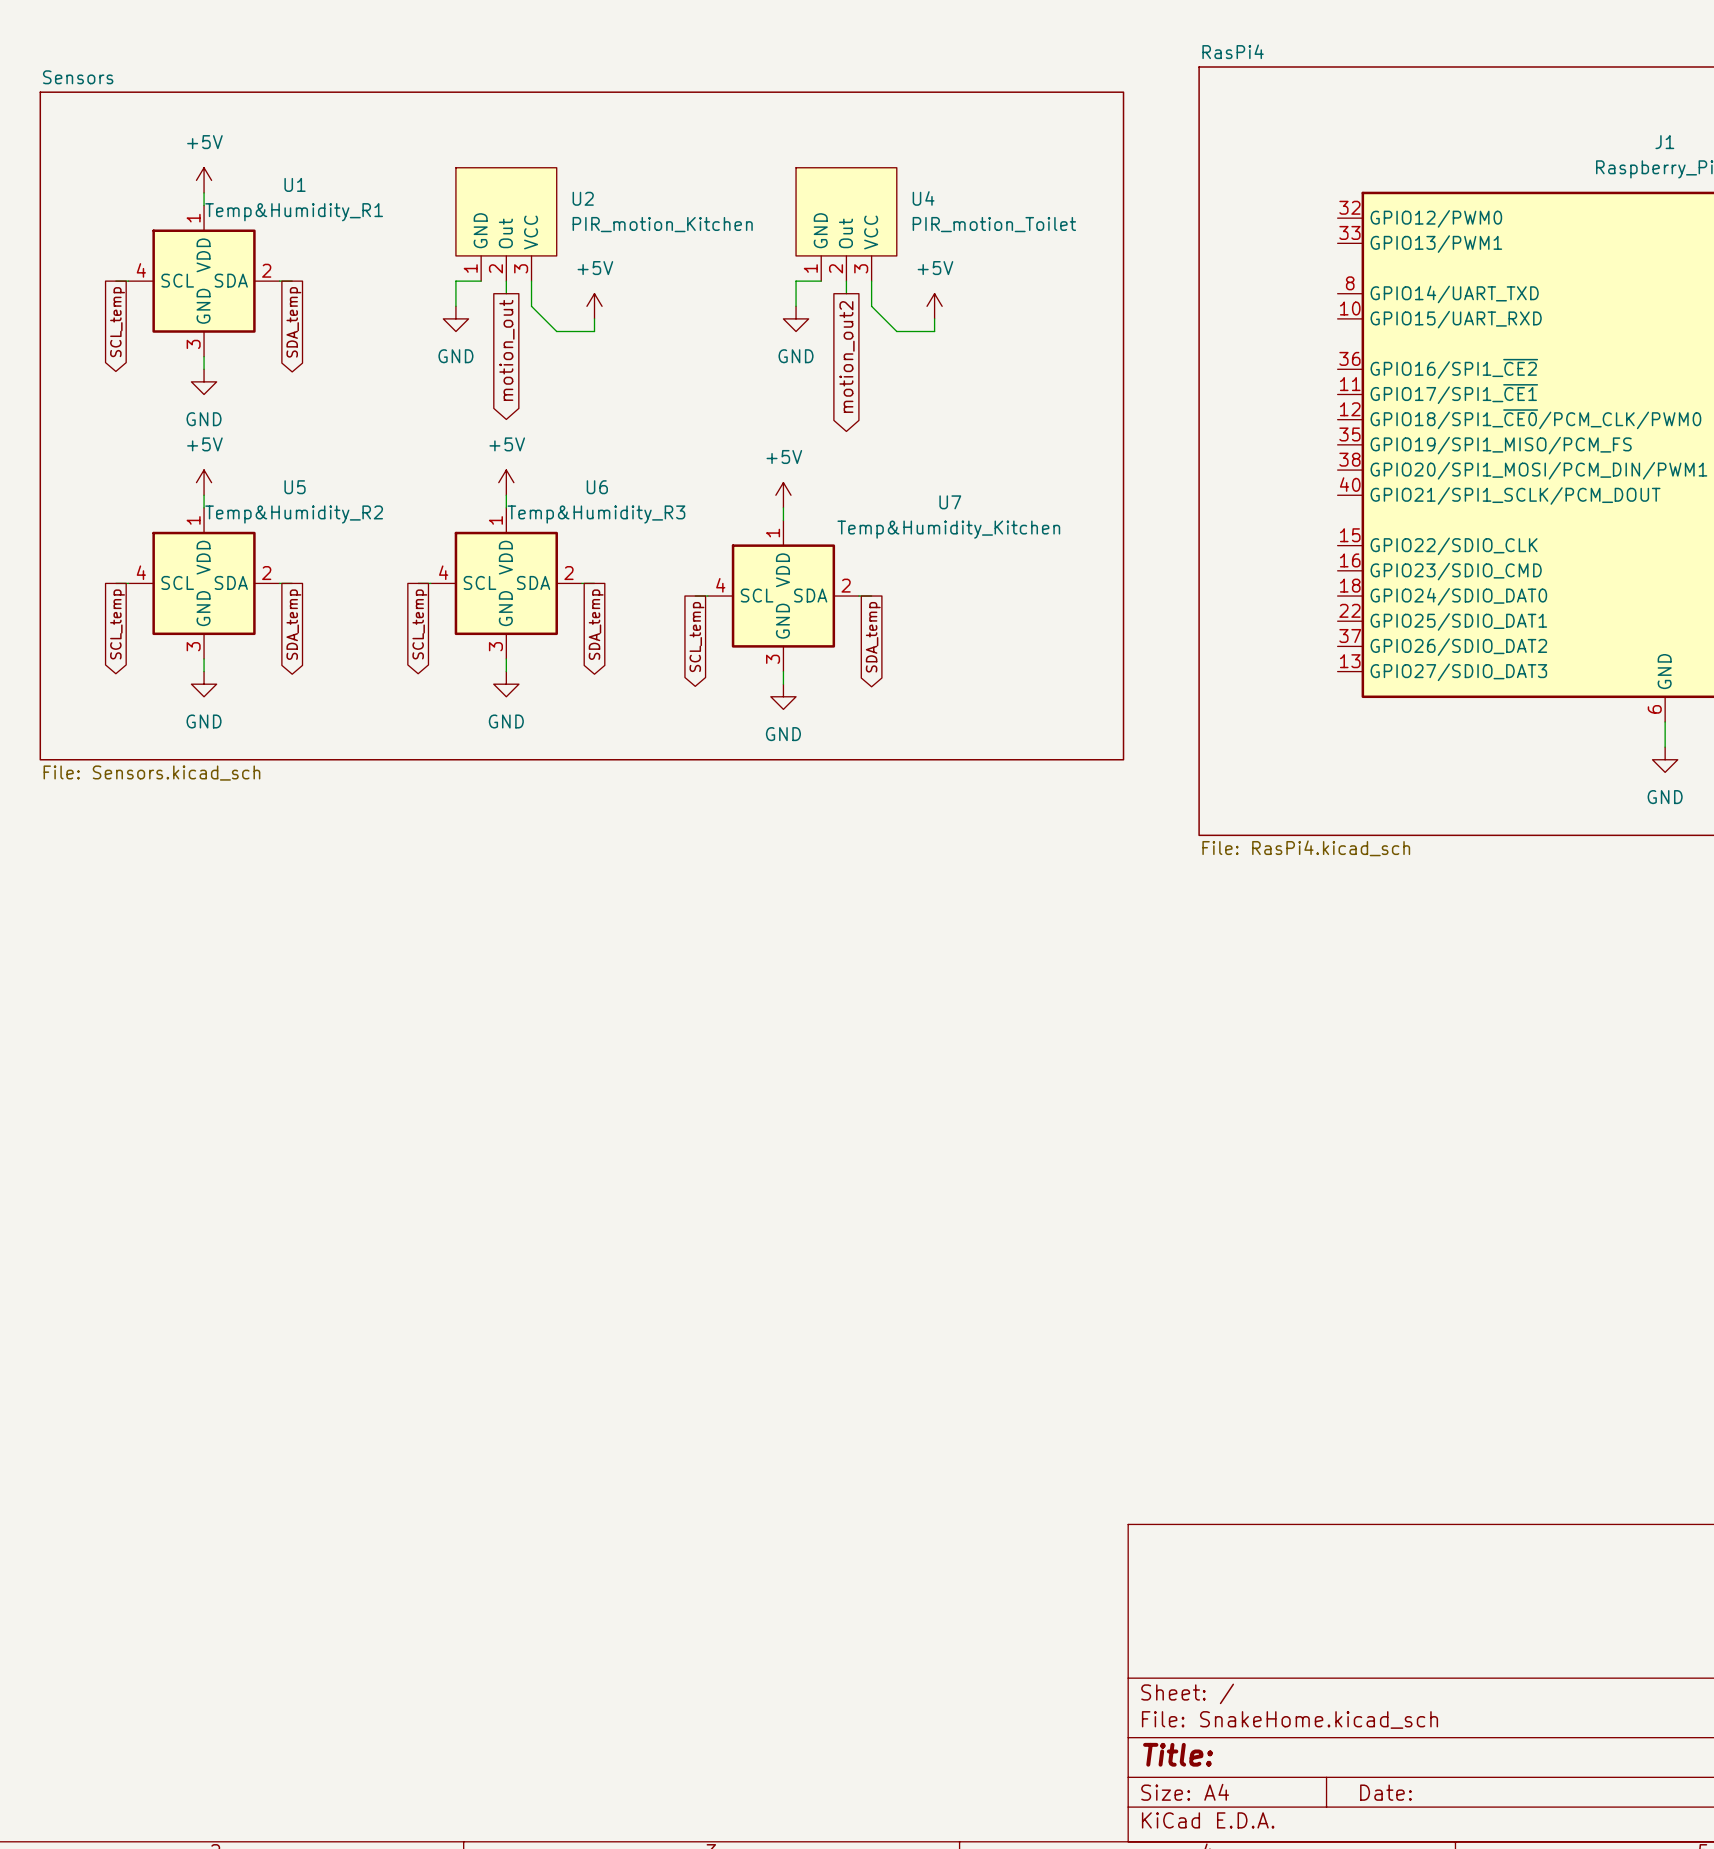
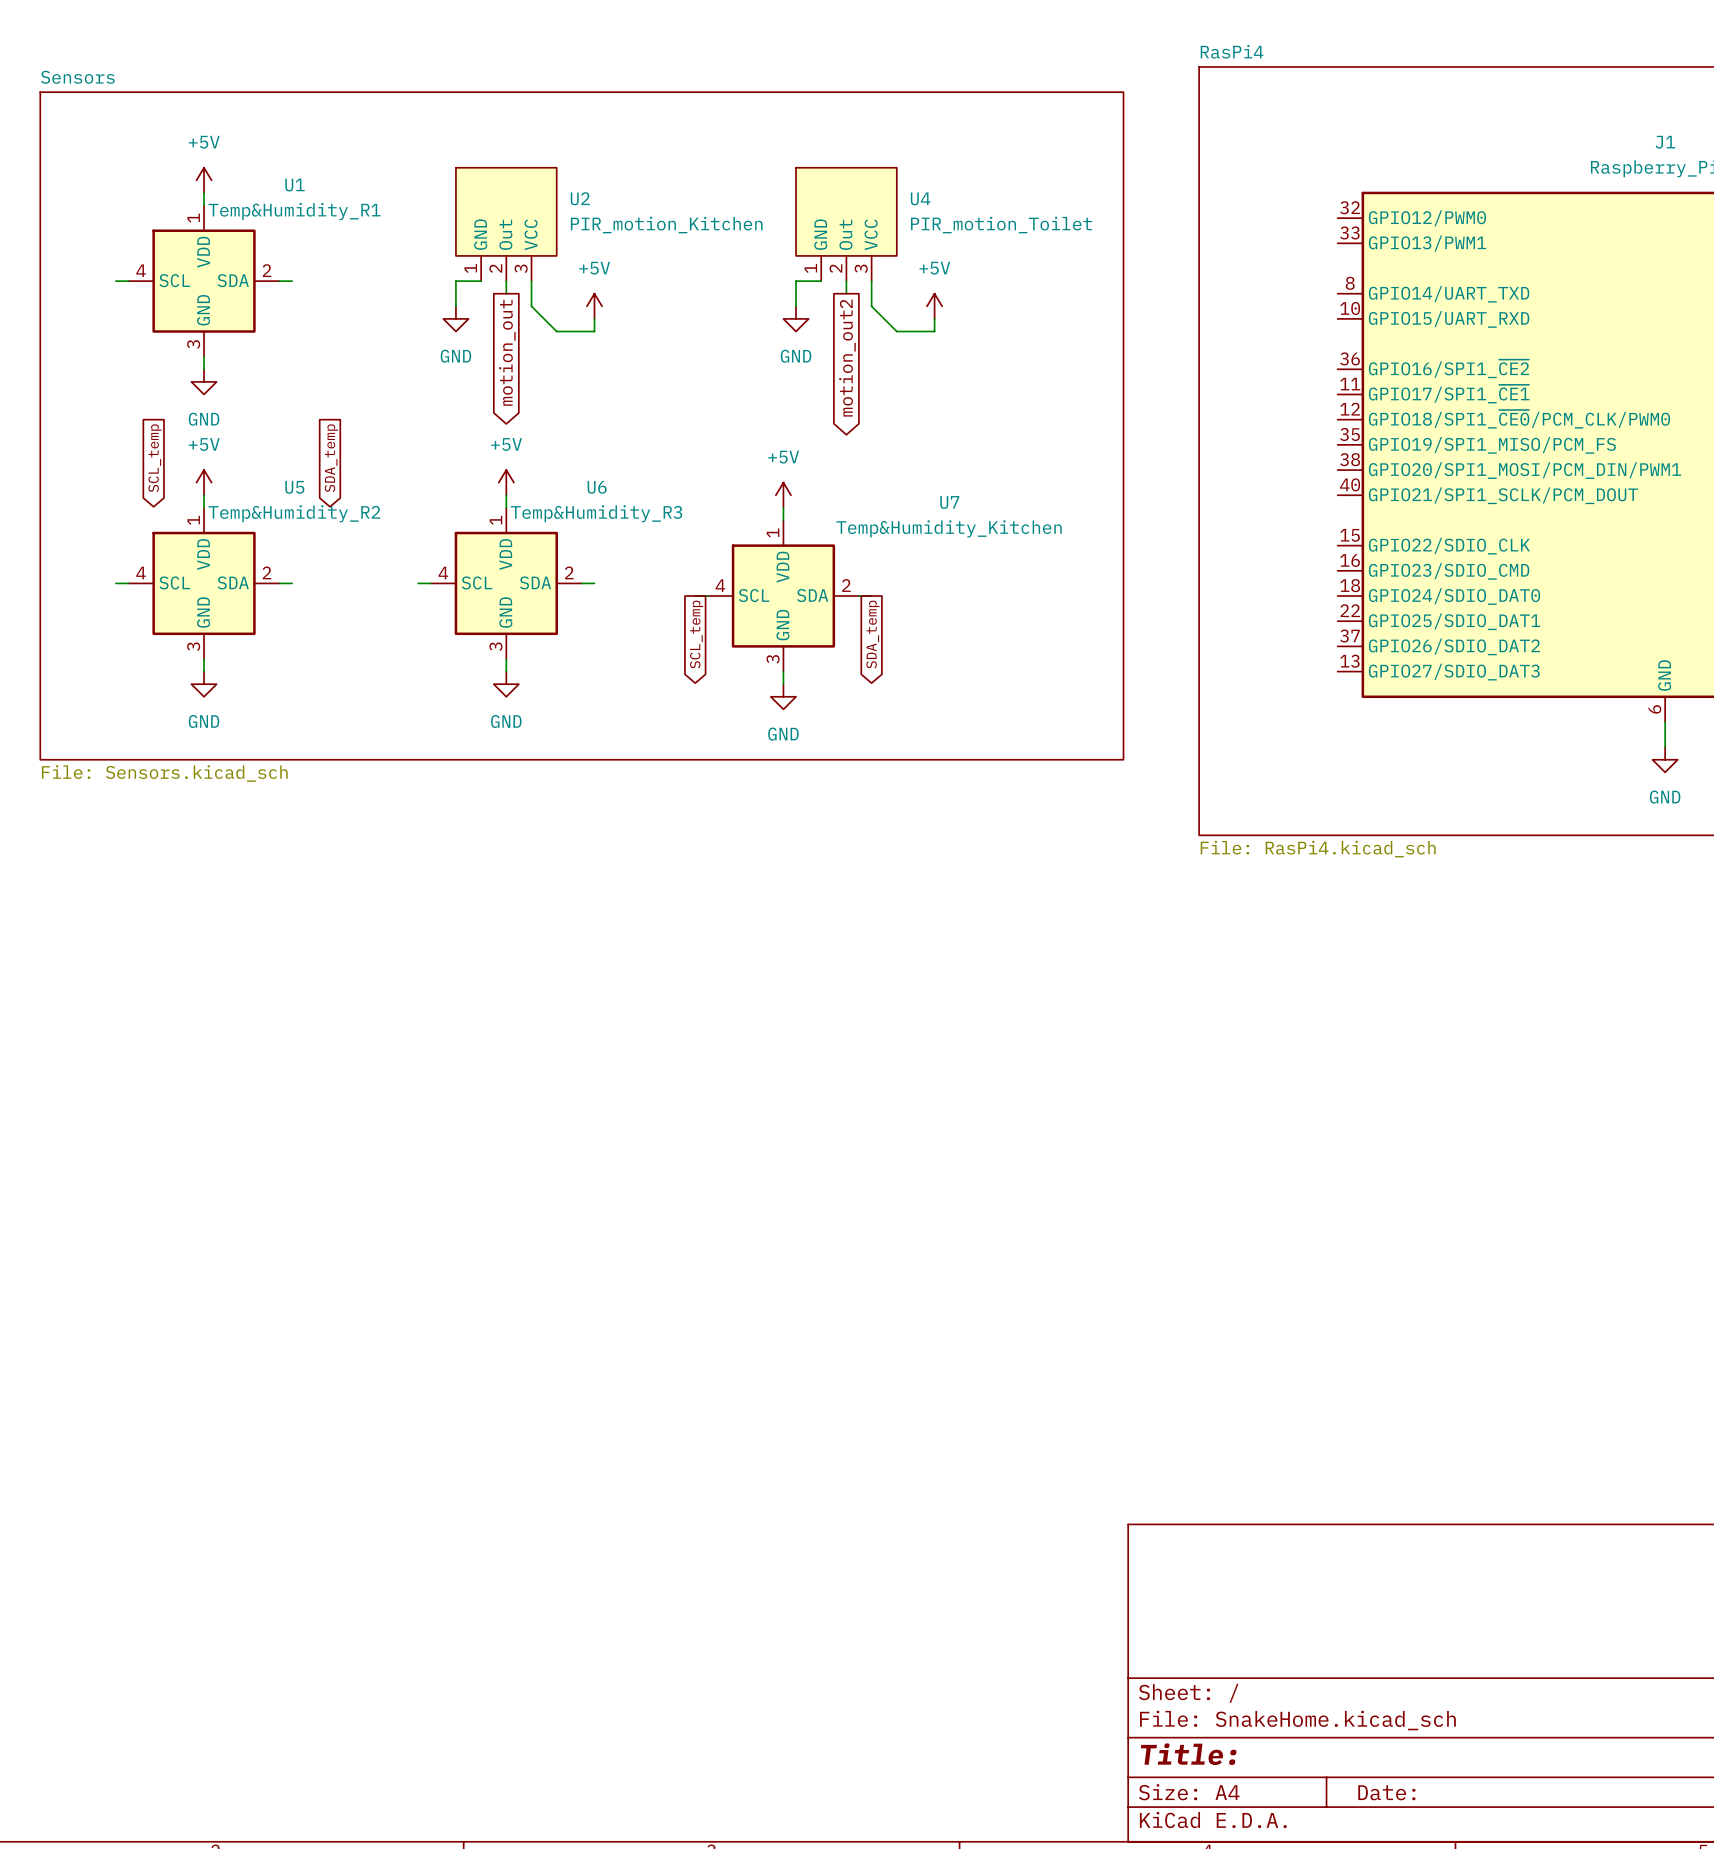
global label: SCL_temp (117, 322) -> none
global label: SDA_temp (293, 322) -> none
global label: none -> SCL_temp (155, 458)
global label: none -> SDA_temp (331, 458)
global label: SCL_temp (117, 624) -> none
global label: SDA_temp (293, 624) -> none
global label: SCL_temp (419, 624) -> none
global label: SDA_temp (596, 624) -> none

